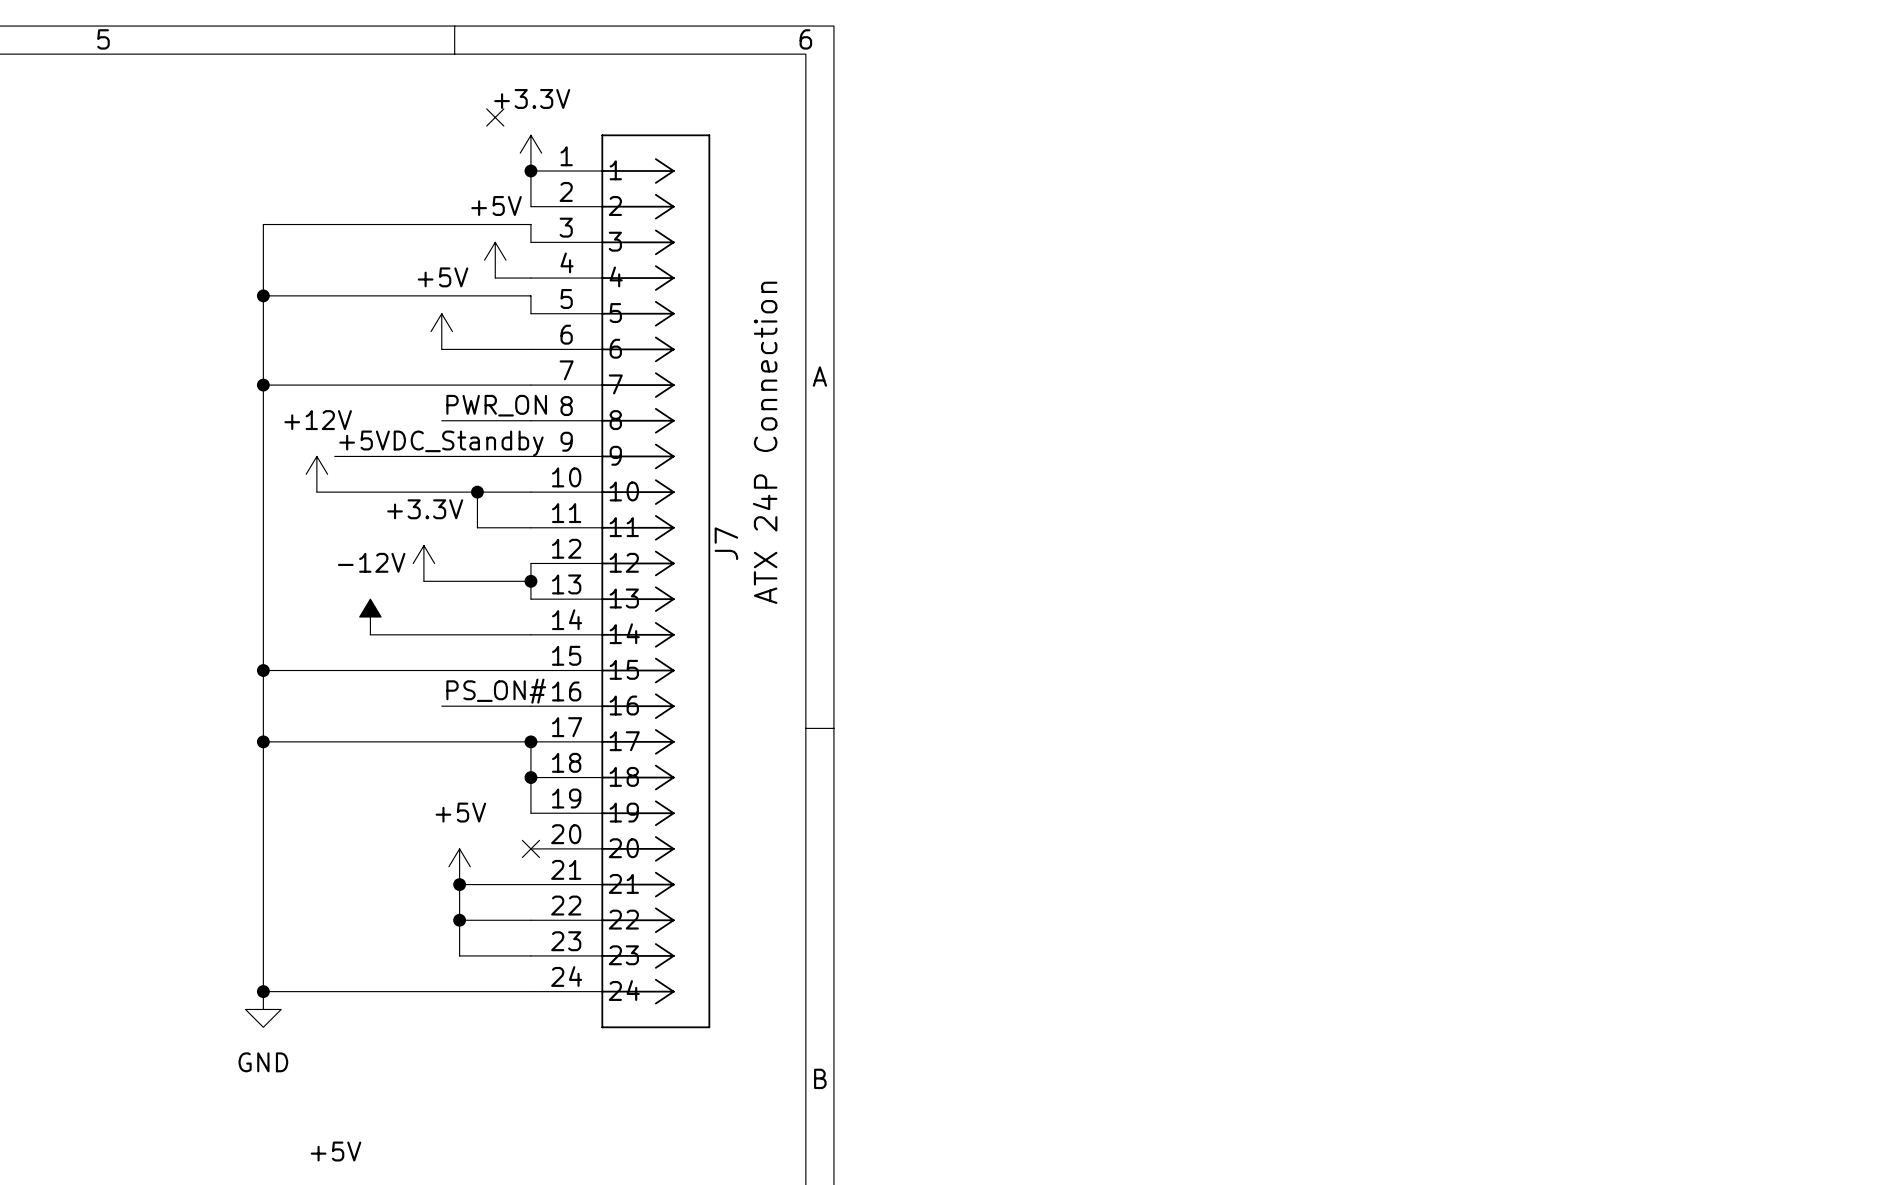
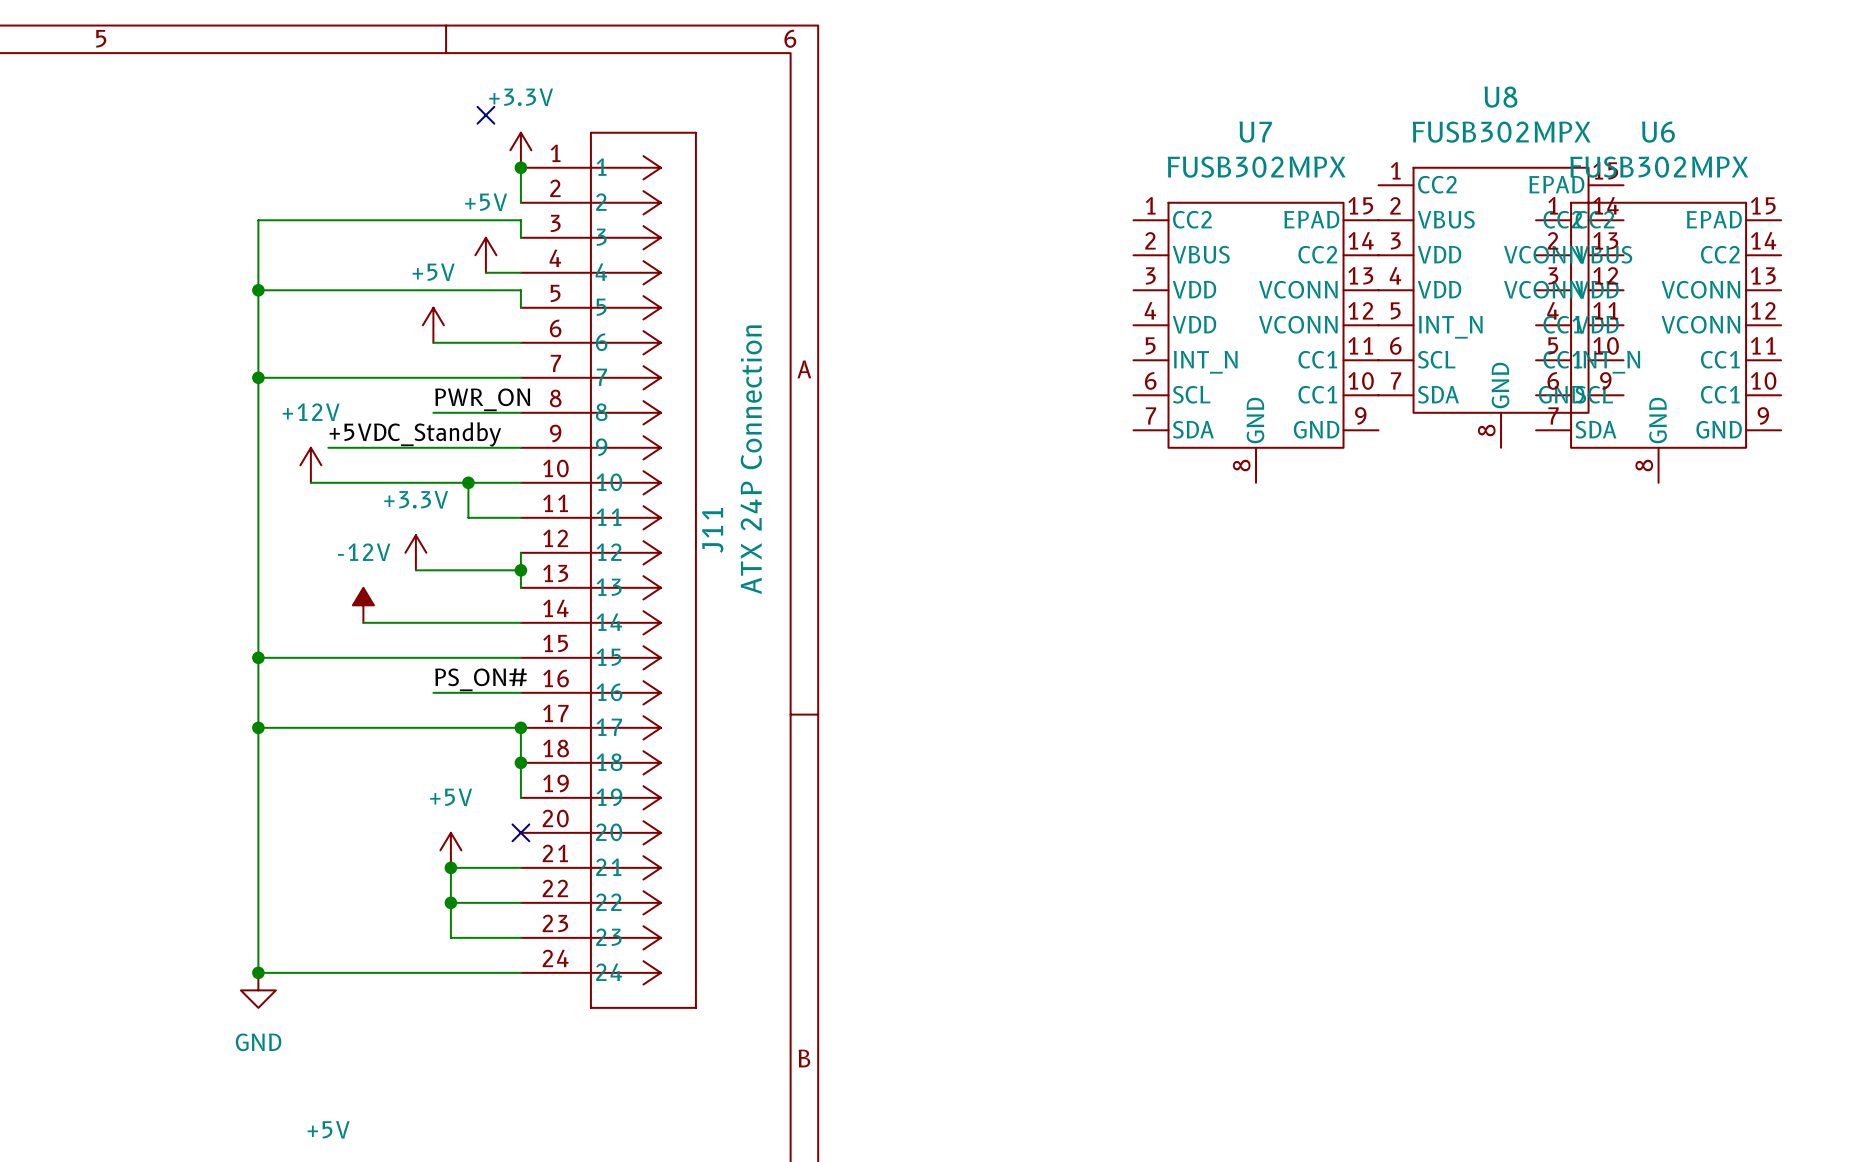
U8: none -> FUSB302MPX (1501, 307)
U7: none -> FUSB302MPX (1256, 342)
U6: none -> FUSB302MPX (1658, 342)
J7 name: J7 (726, 543) -> J11 (712, 530)

